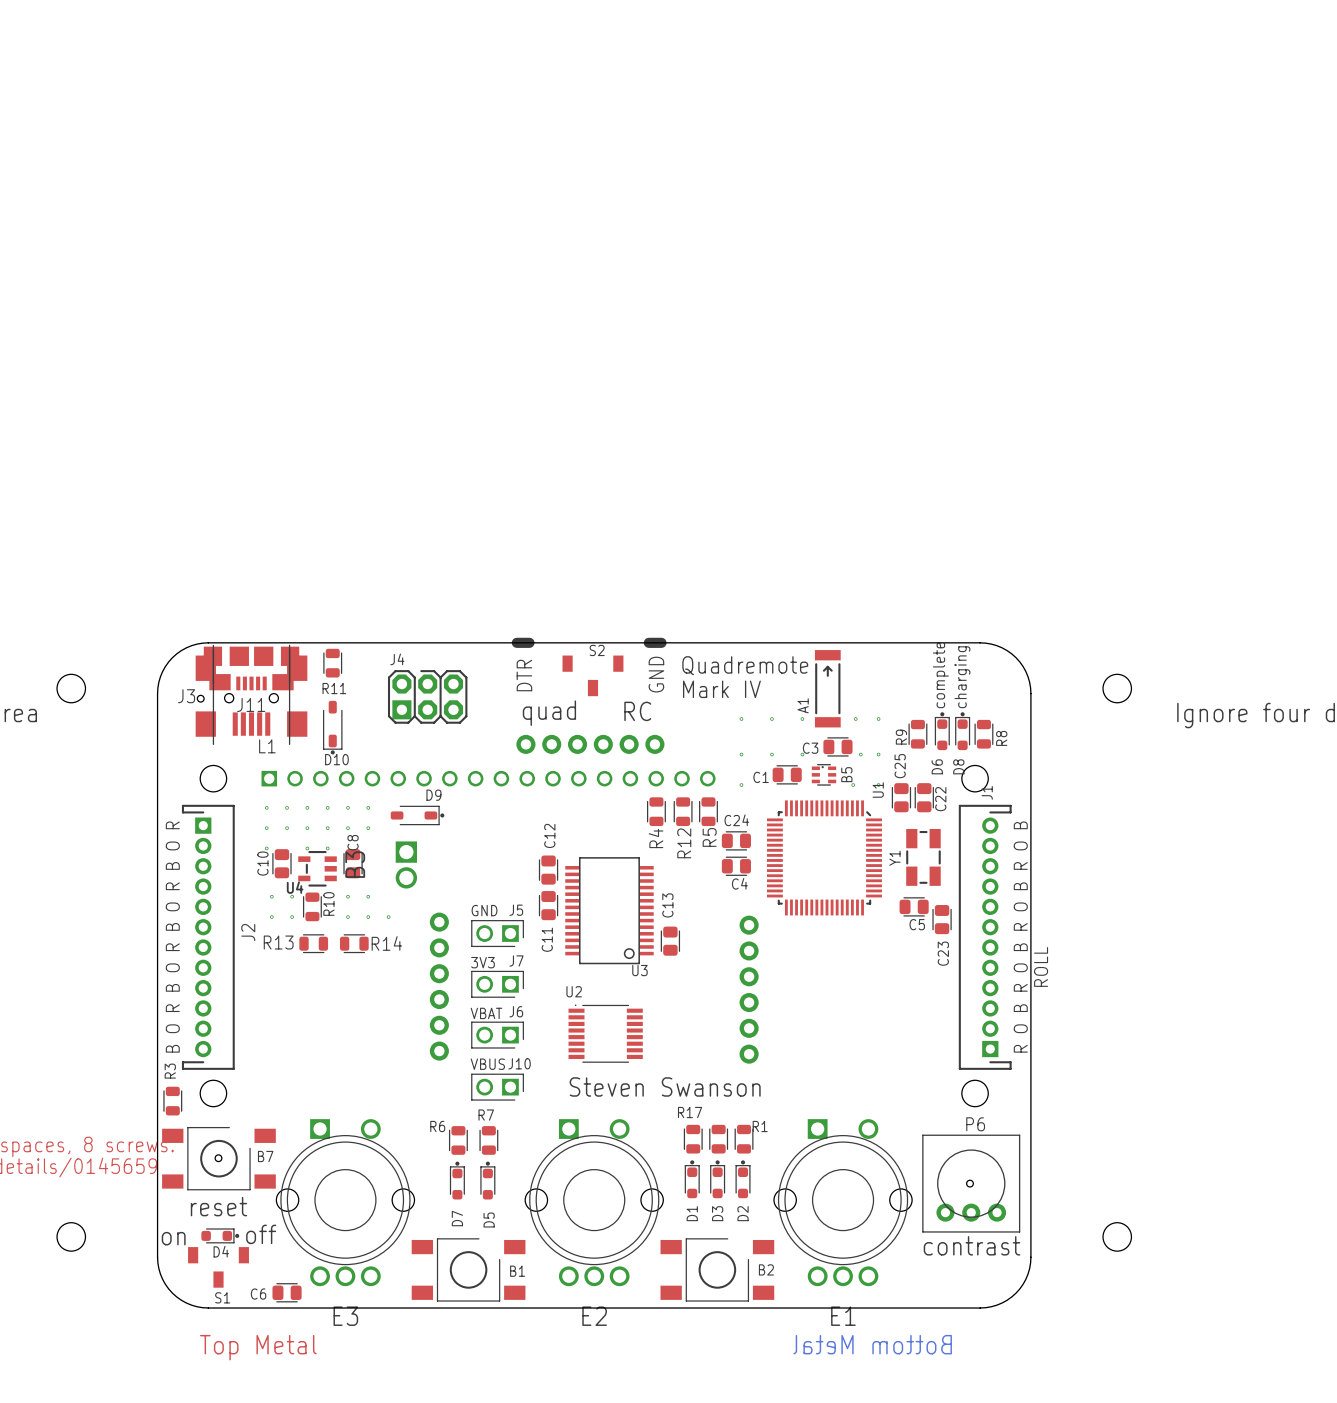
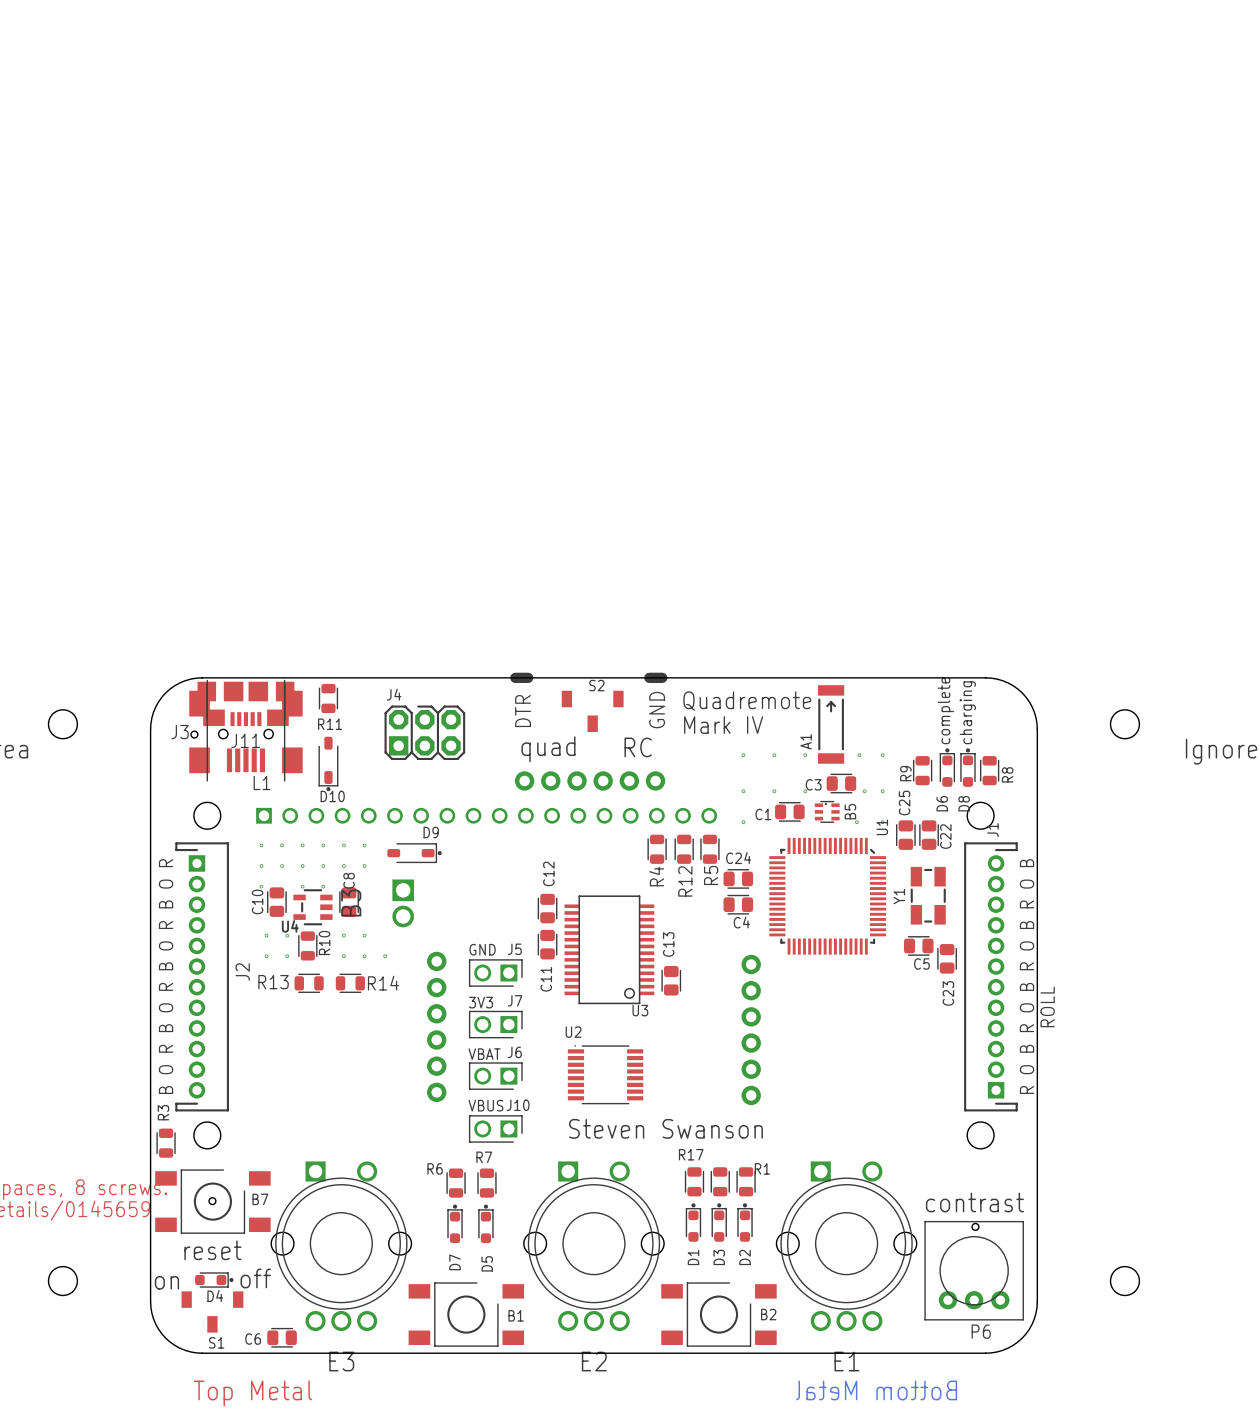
P6 name position: P6 (975, 1124) -> P6 (981, 1331)
P6 position: (971, 1183) -> (974, 1270)
text position: contrast (972, 1245) -> contrast (974, 1202)

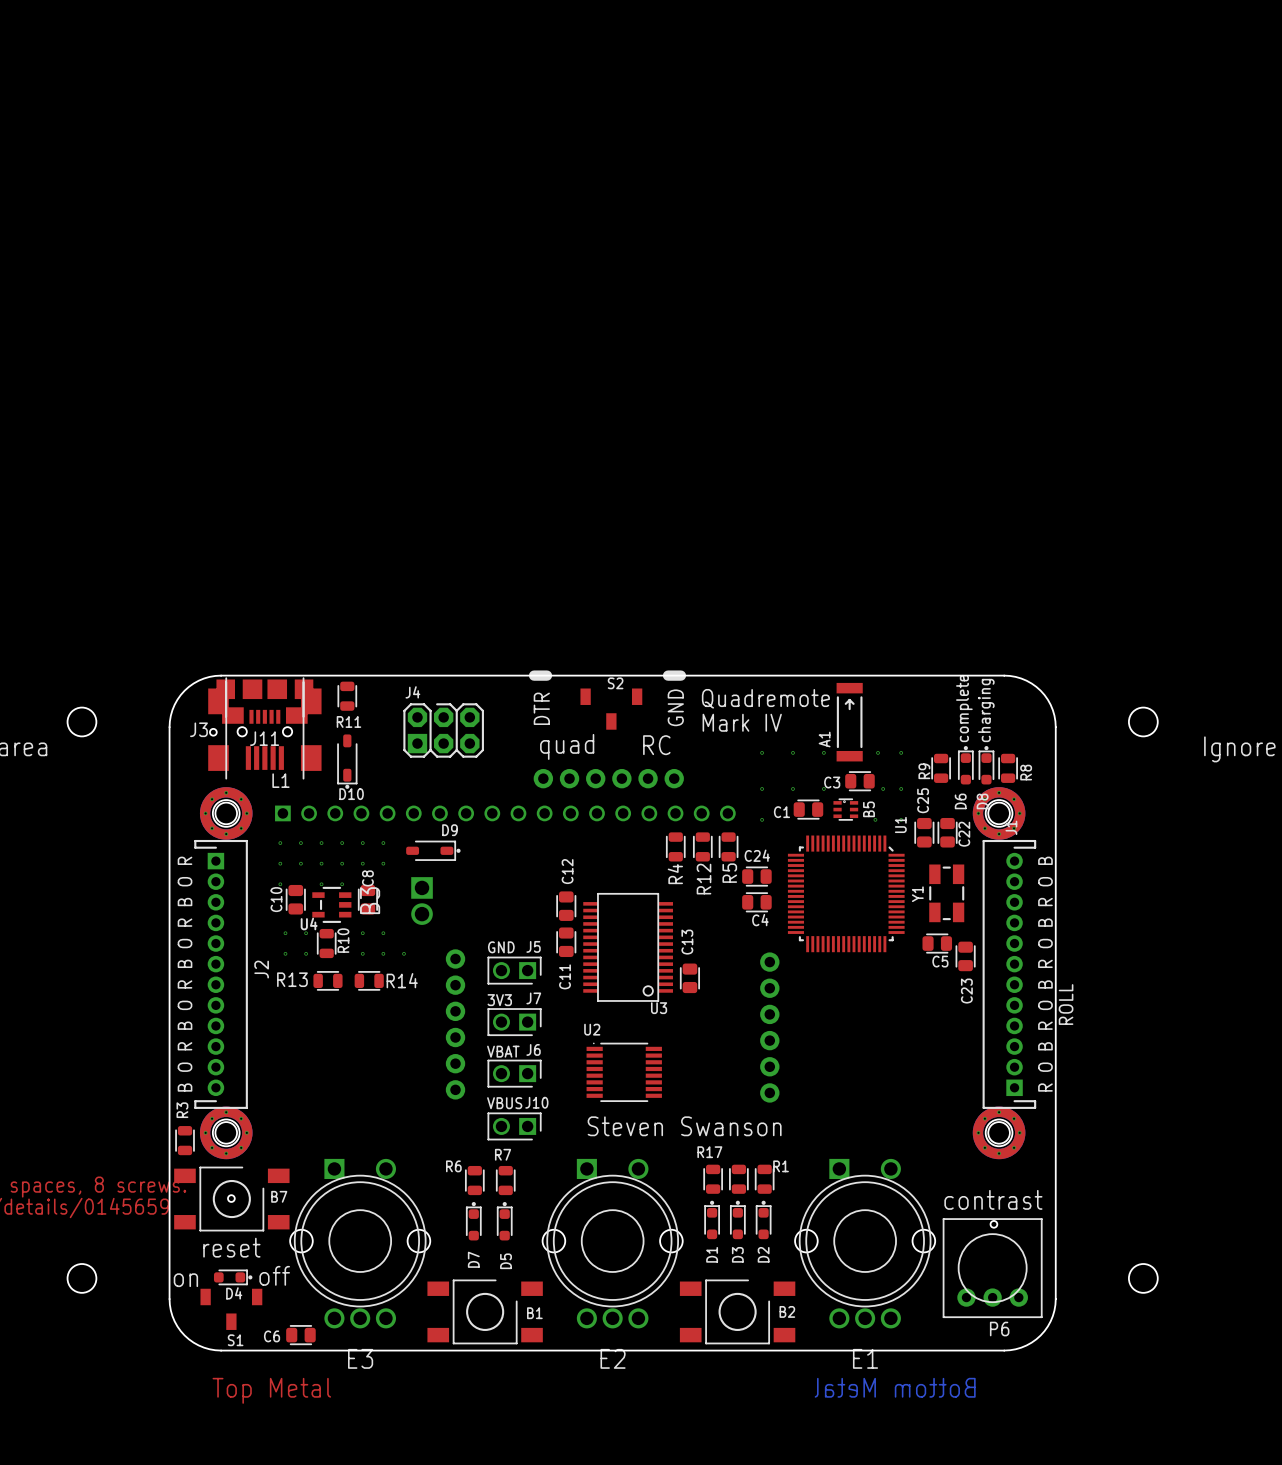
part: none -> (226, 813)
part: none -> (999, 813)
part: none -> (226, 1132)
part: none -> (999, 1132)

